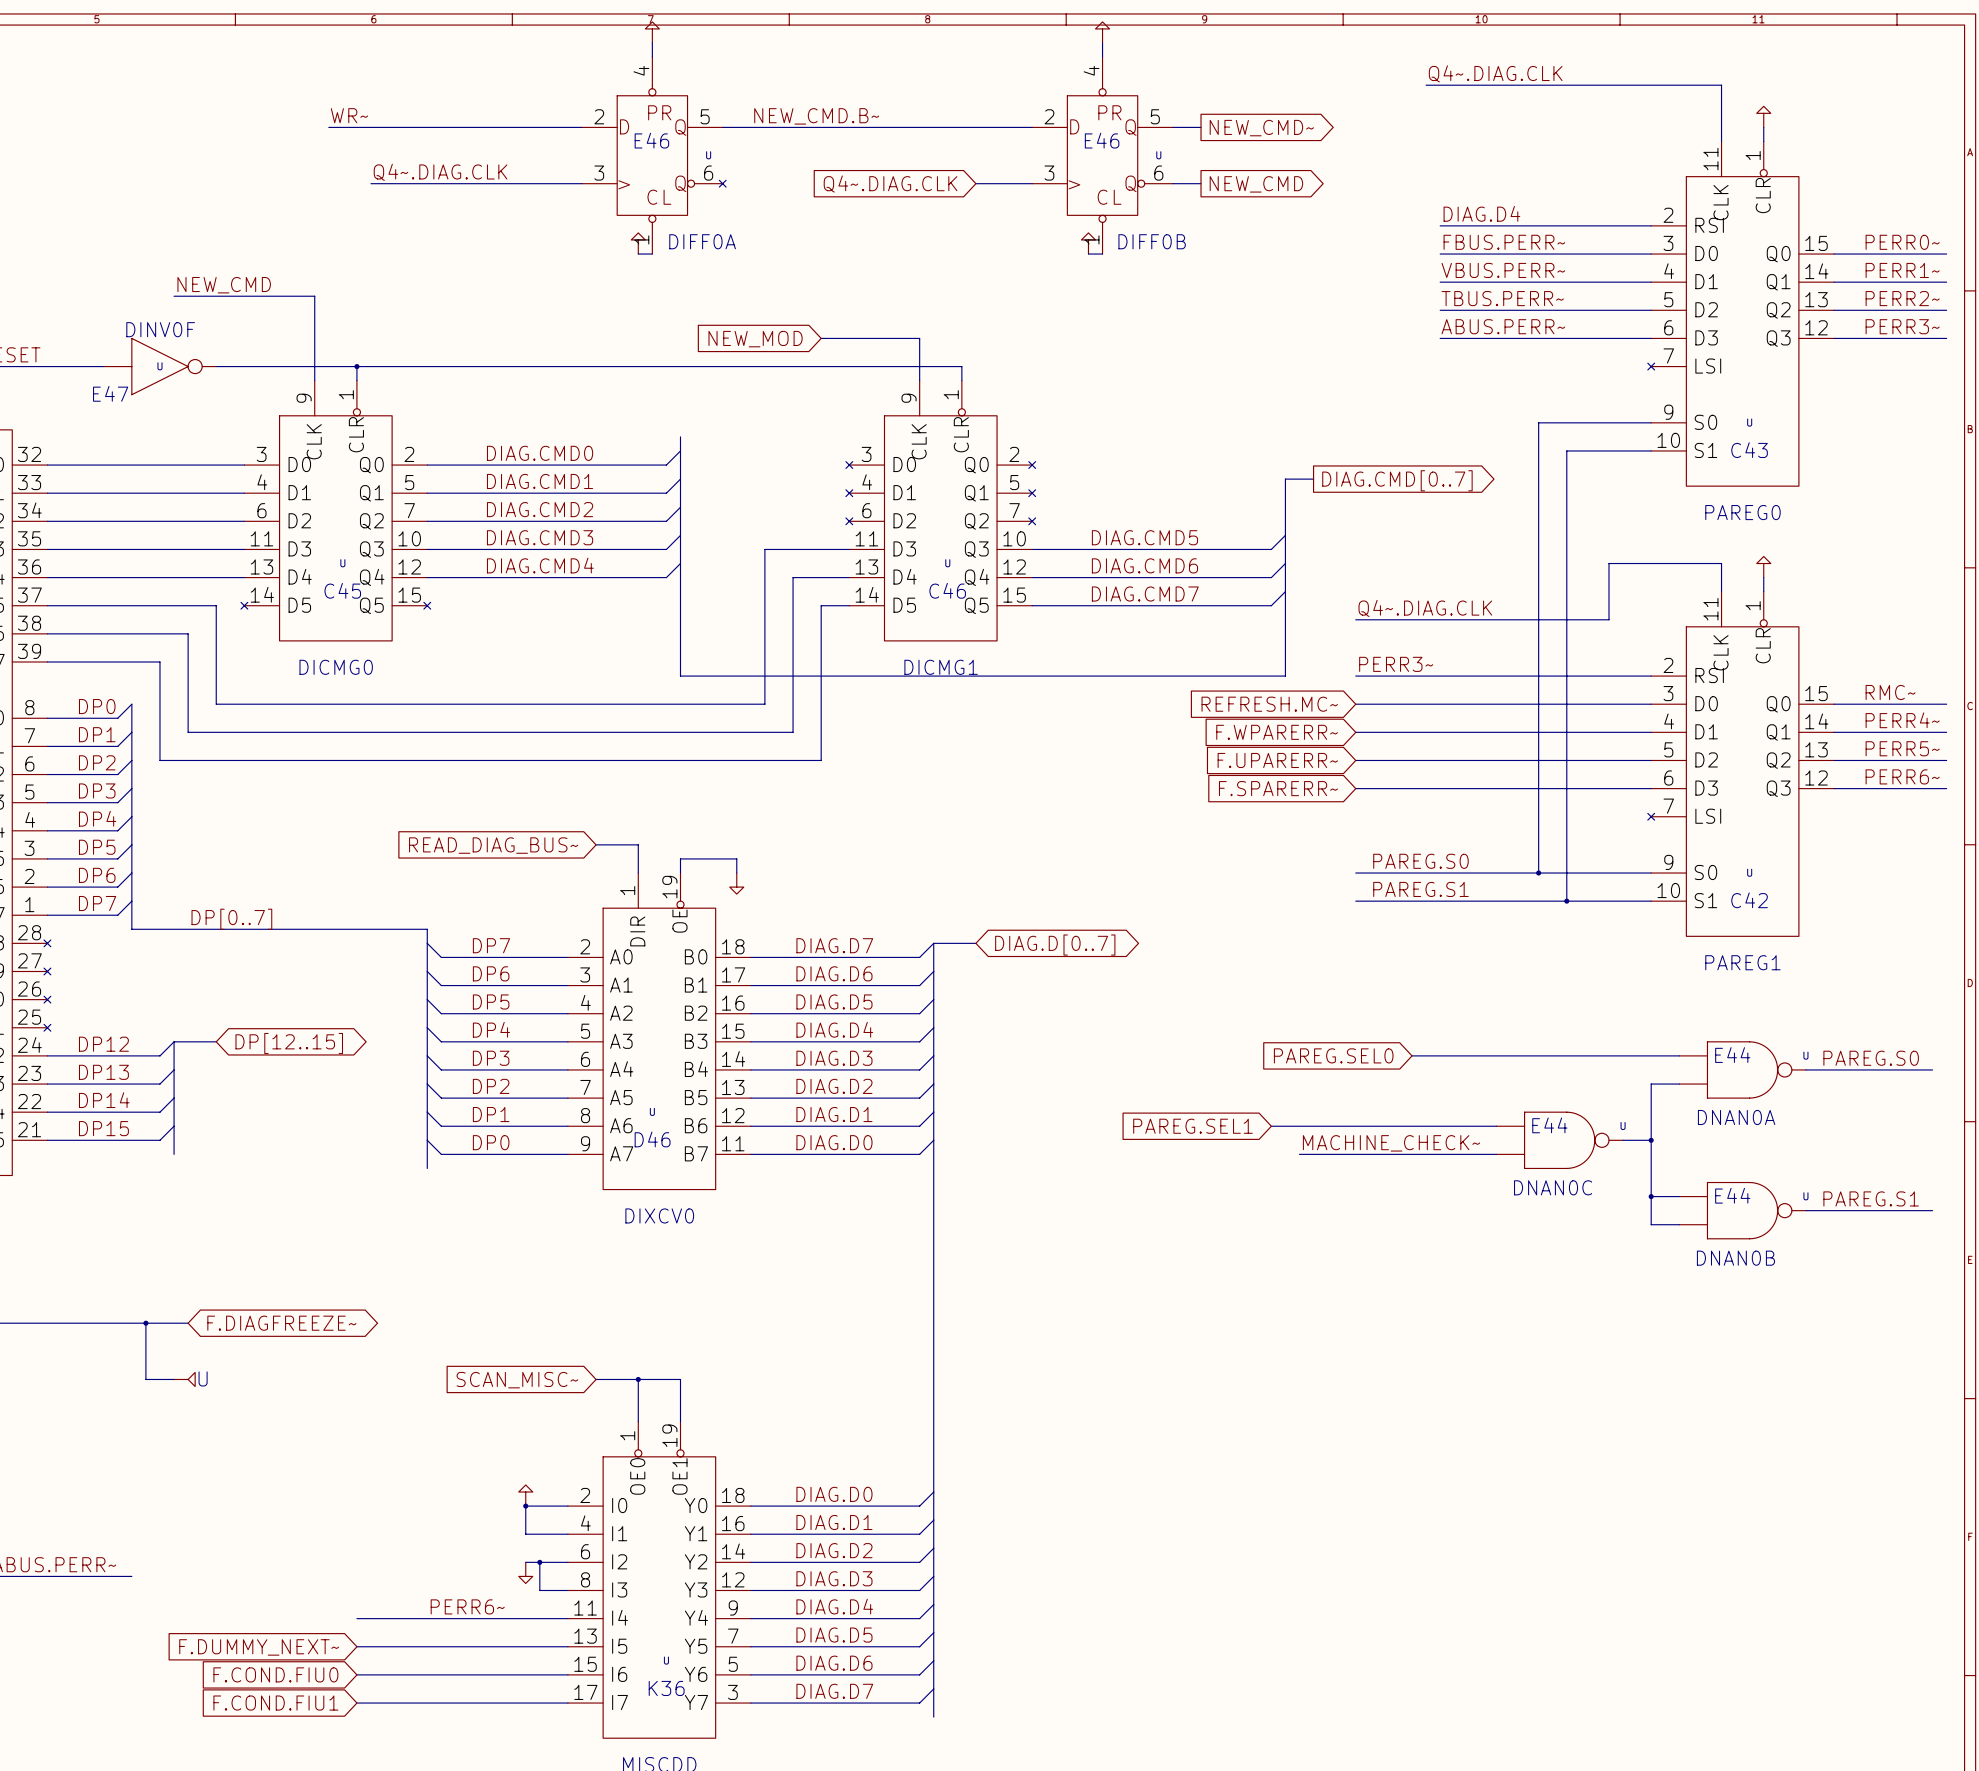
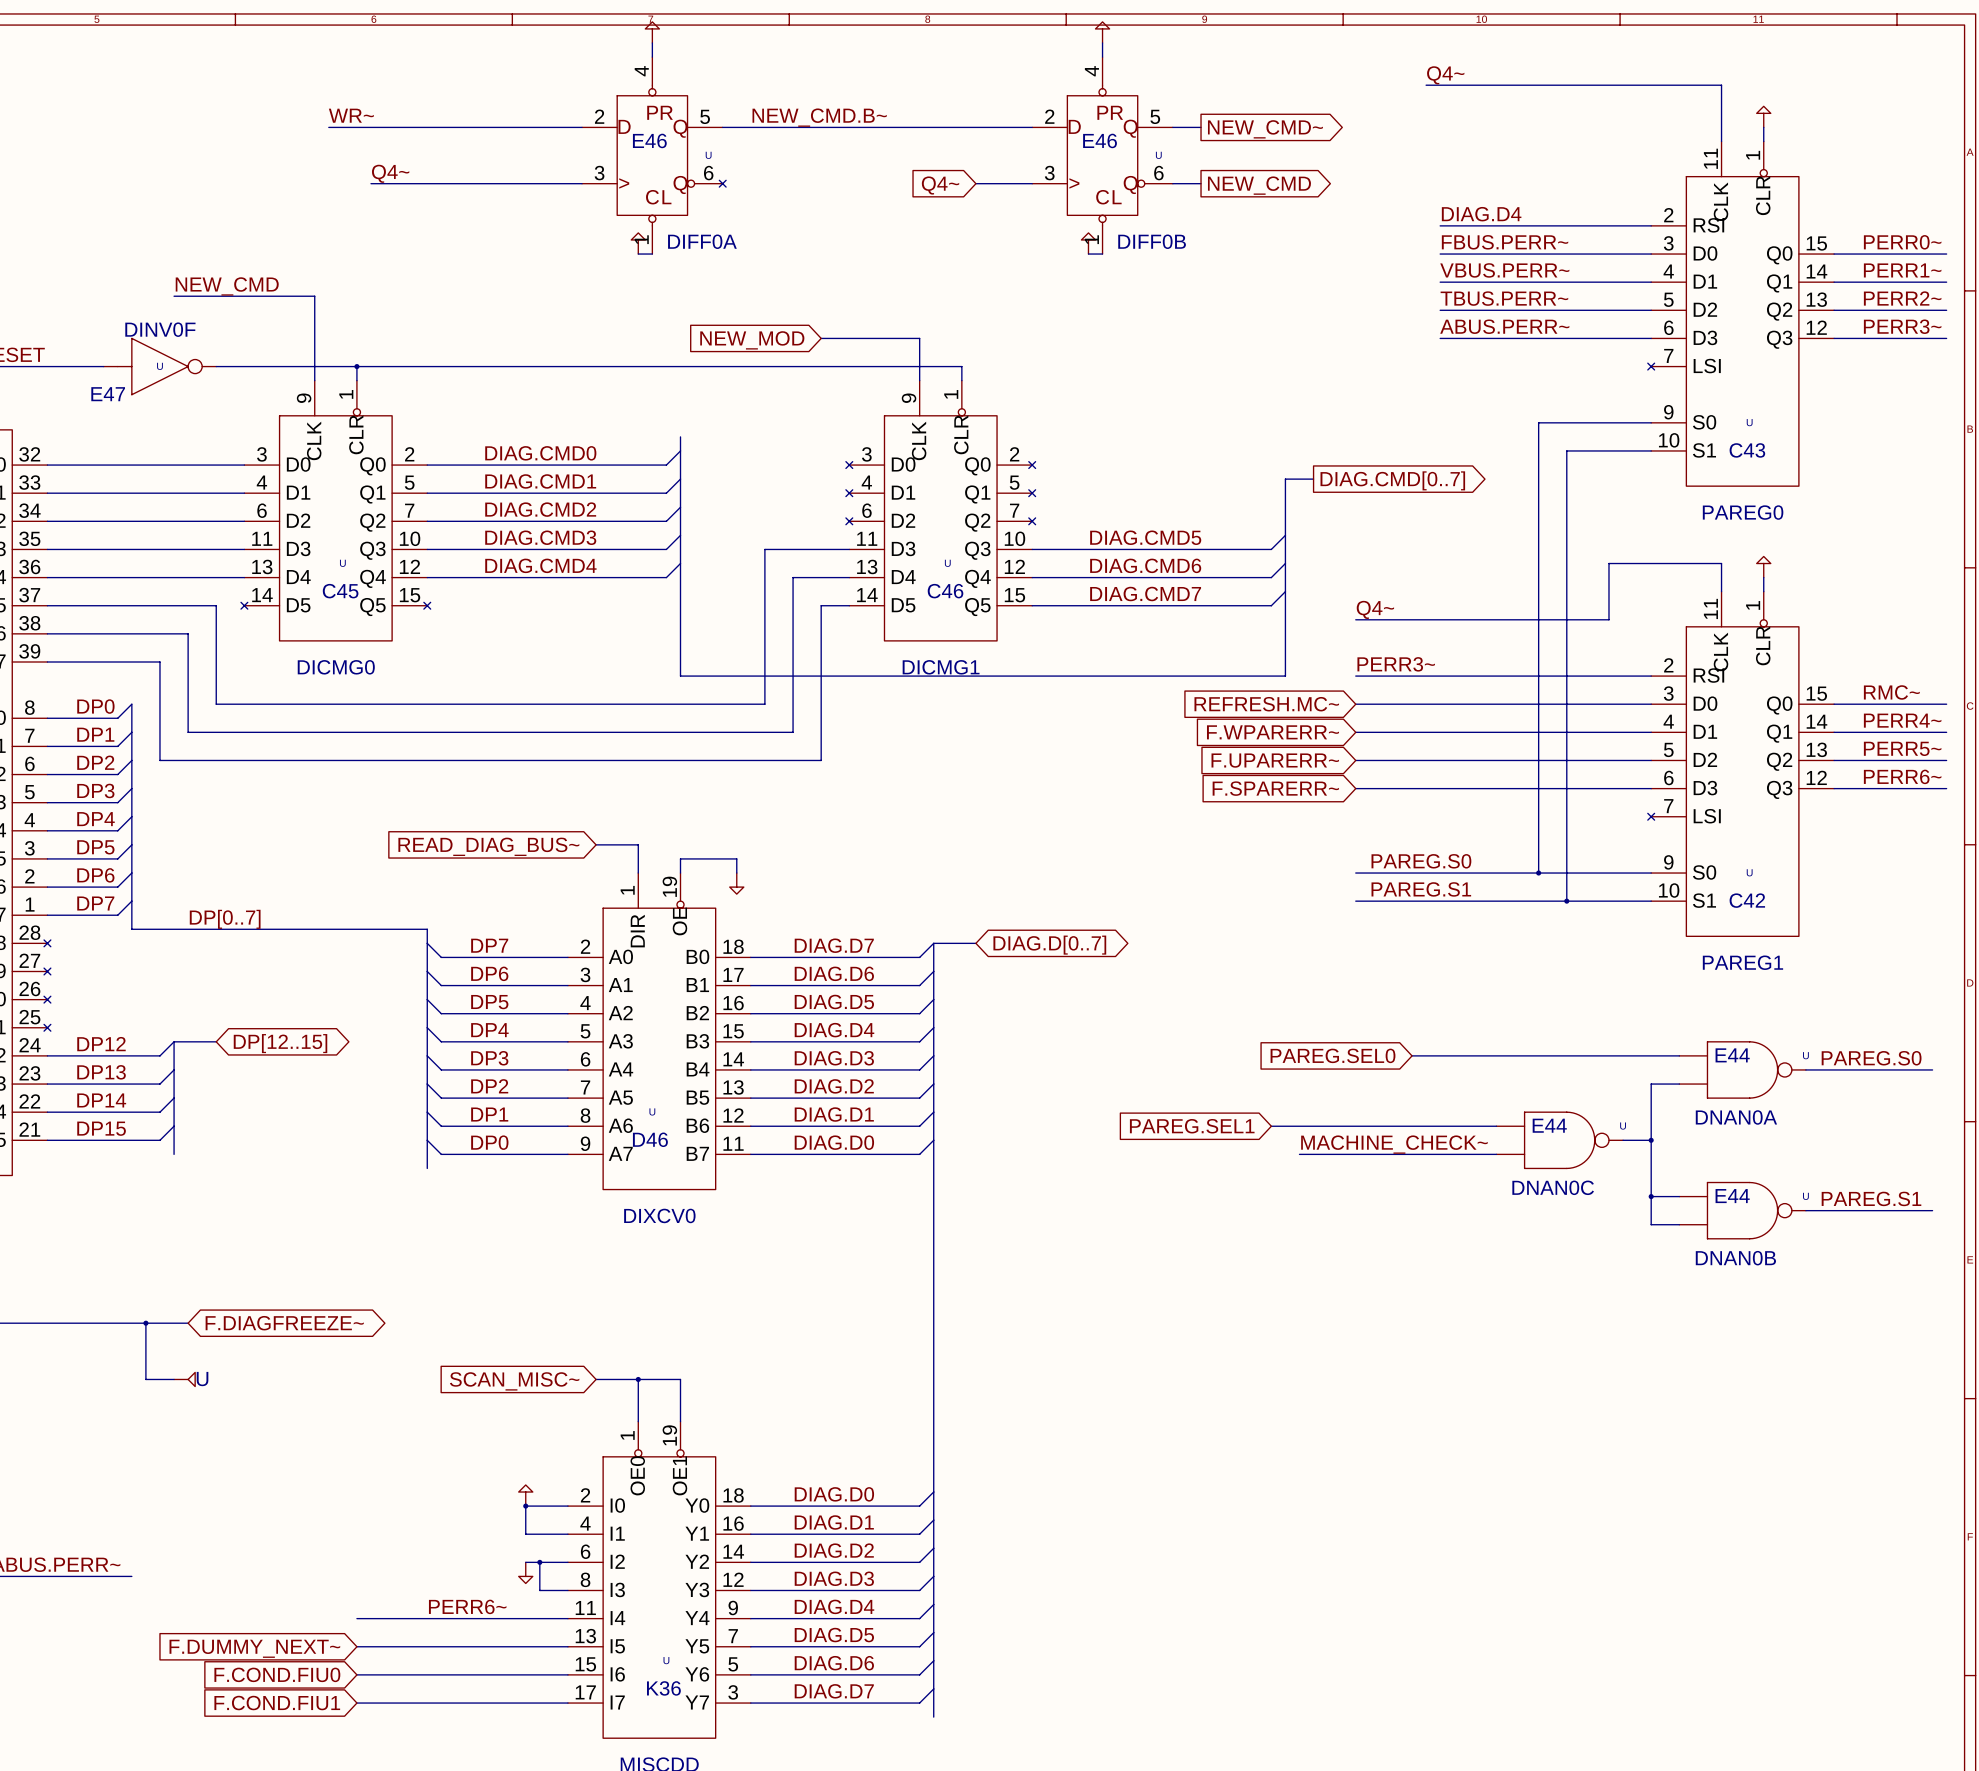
label: Q4~.DIAG.CLK (1495, 73) -> Q4~ (1445, 75)
label: Q4~.DIAG.CLK (440, 172) -> Q4~ (390, 173)
global label: Q4~.DIAG.CLK (890, 184) -> Q4~ (940, 185)
label: Q4~.DIAG.CLK (1425, 608) -> Q4~ (1375, 609)

